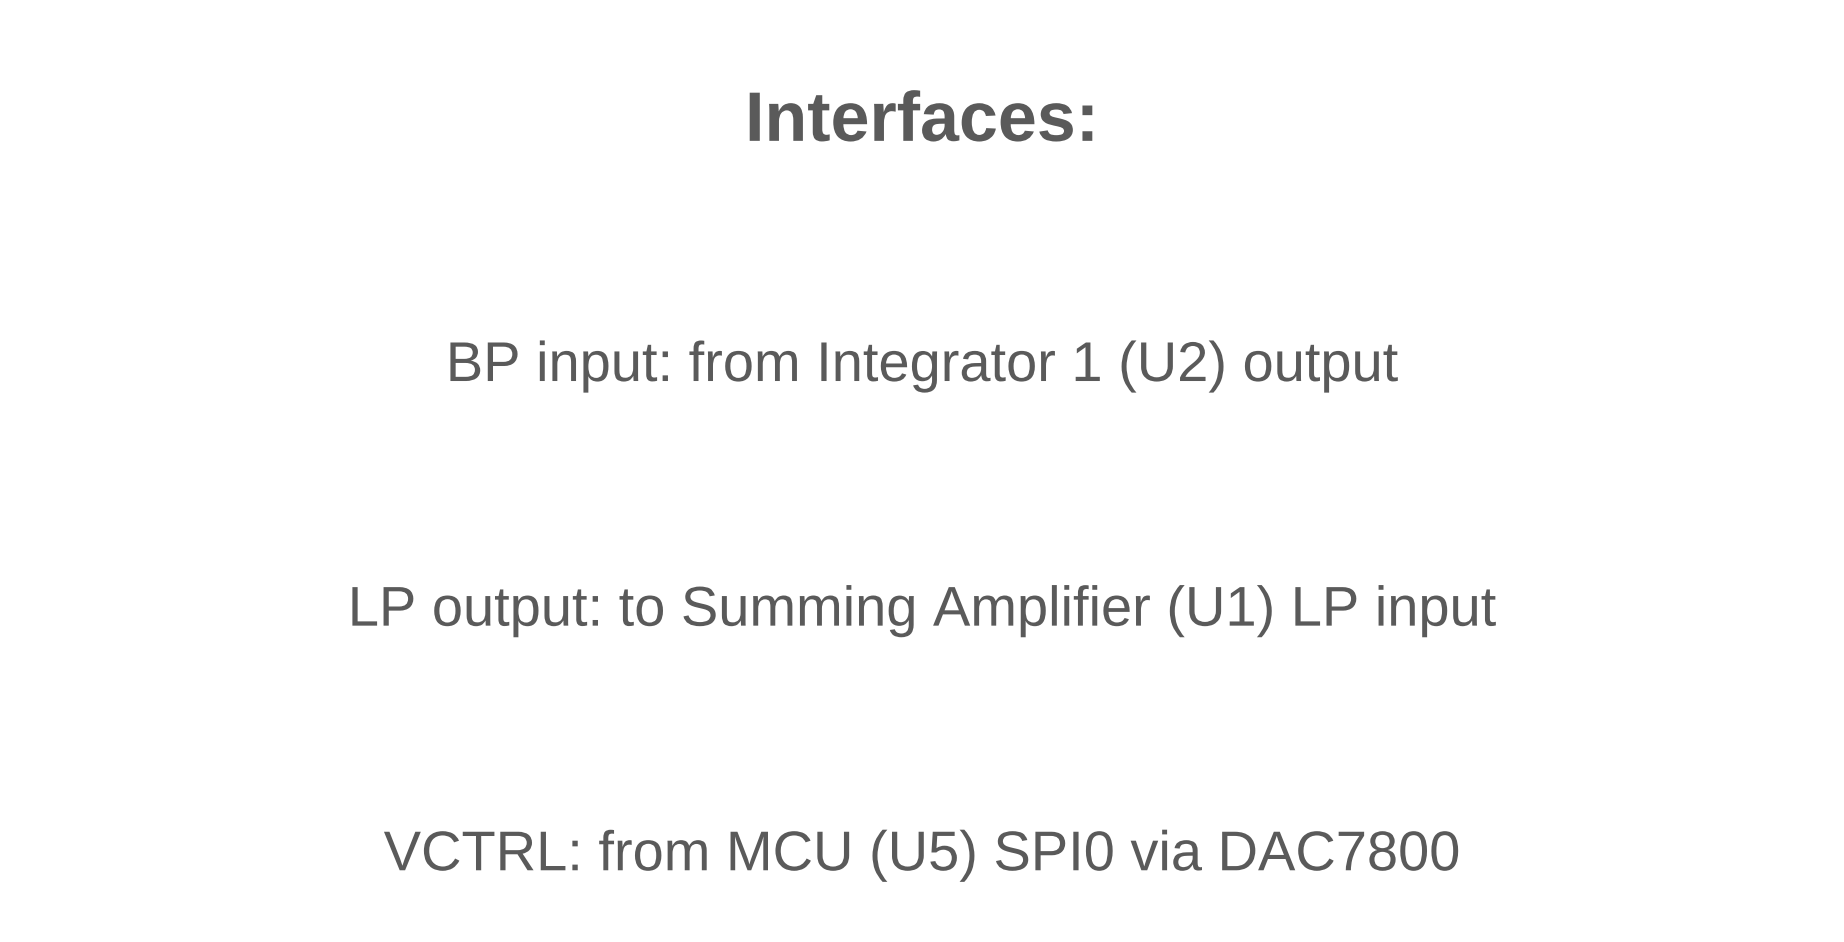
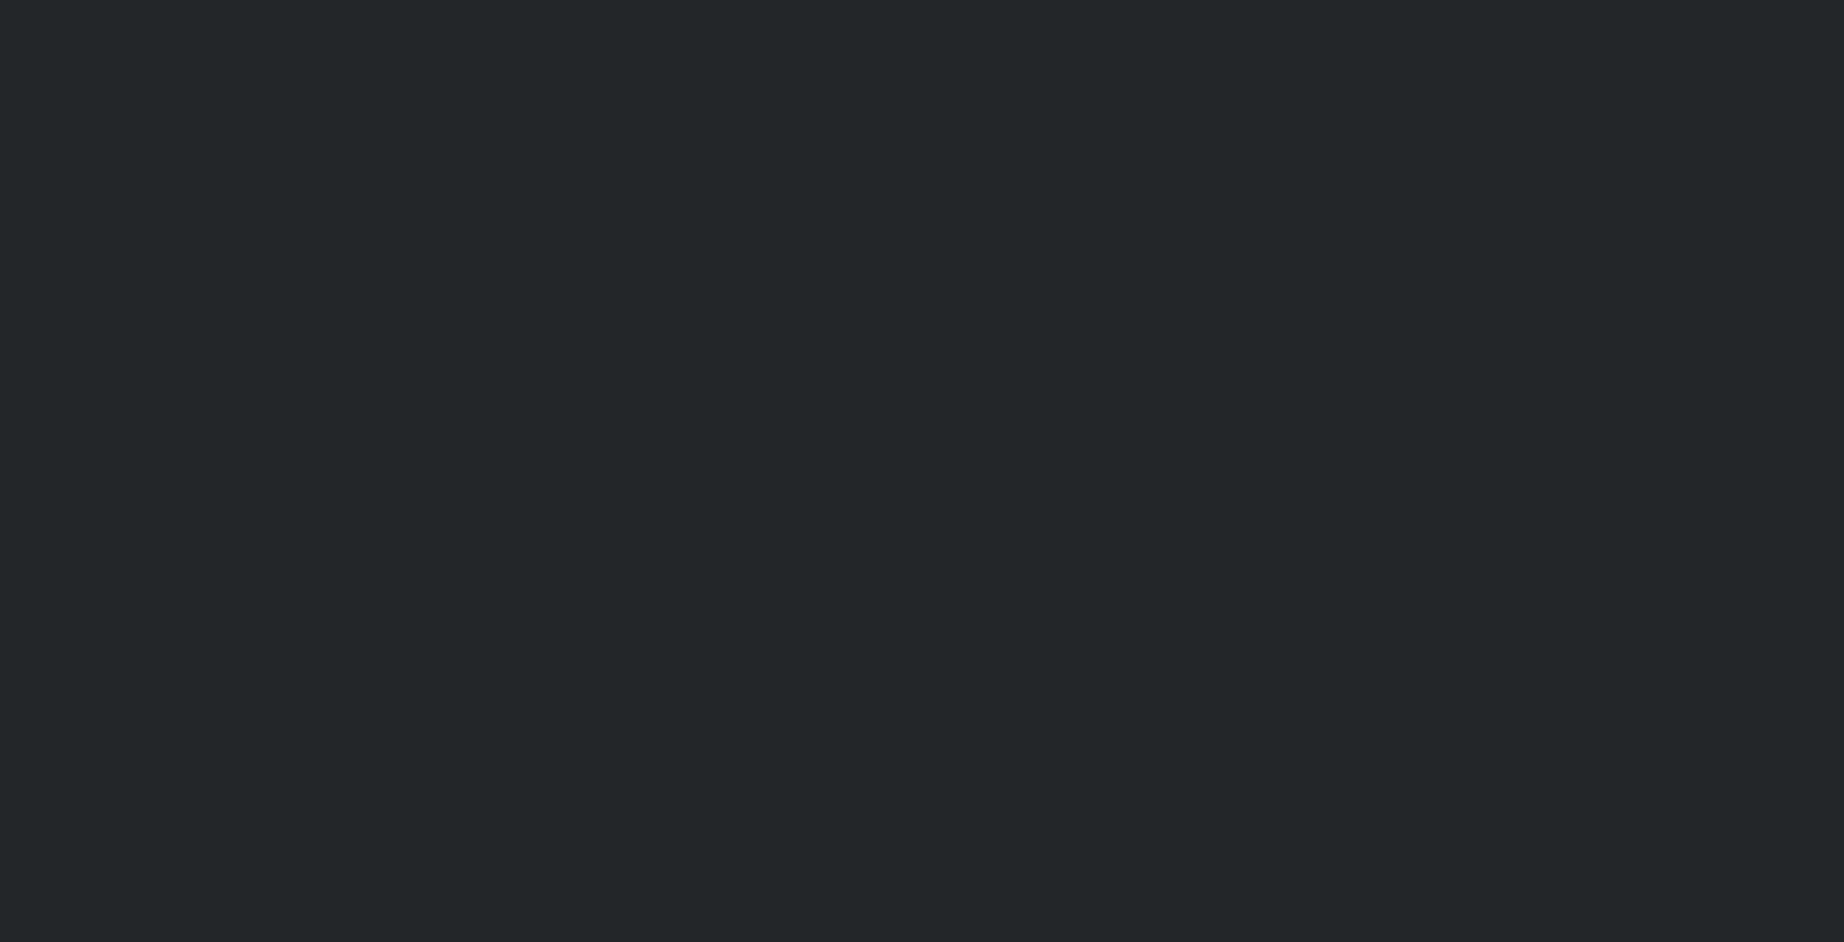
text: Interfaces: (921, 115) -> none
text: BP input: from Integrator 1 (U2) output (924, 366) -> none
text: LP output: to Summing Amplifier (U1) LP input (924, 611) -> none
text: VCTRL: from MCU (U5) SPI0 via DAC7800 (921, 855) -> none

